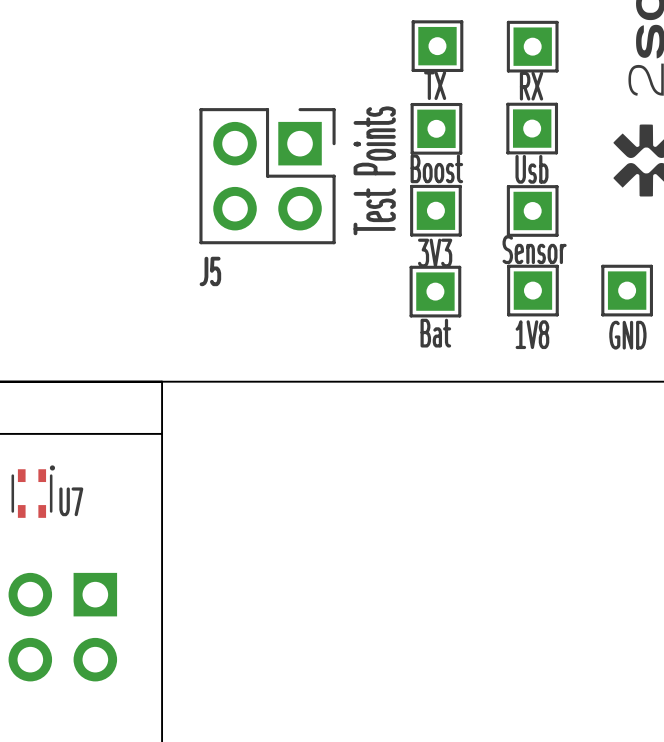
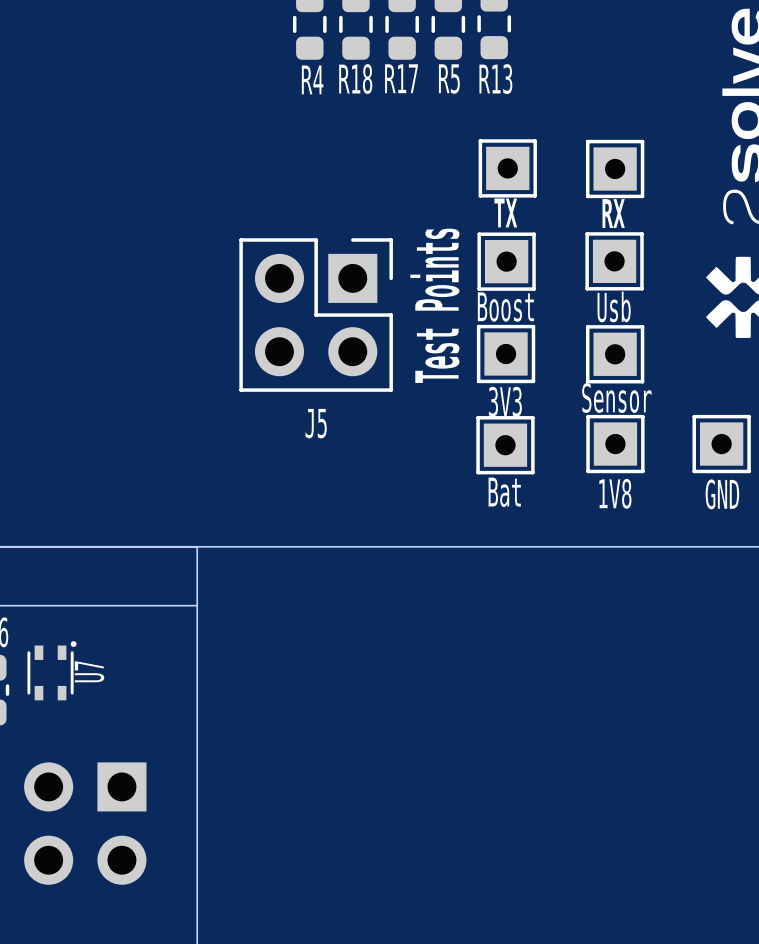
J5 name position: J5 (210, 271) -> J5 (316, 423)
U7 name rotation: 0° (71, 501) -> 90° counterclockwise (89, 671)

